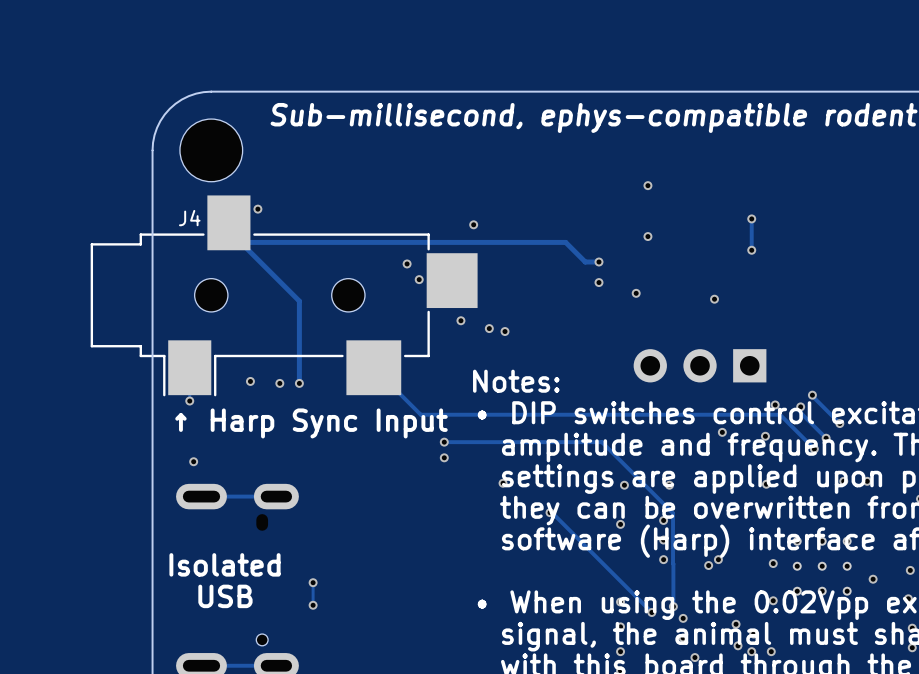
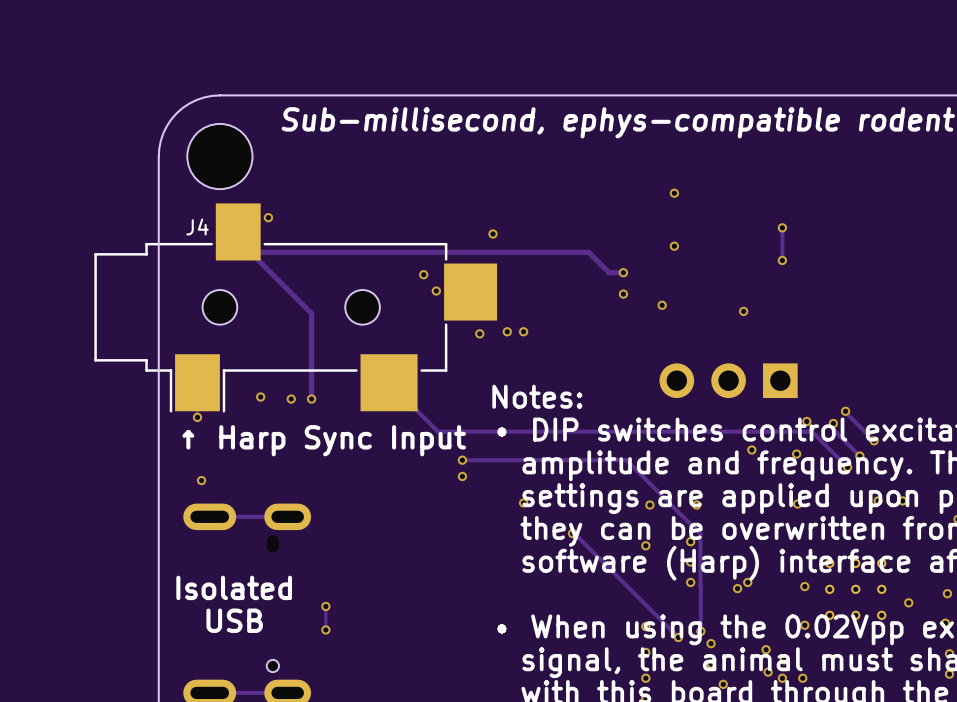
via: none -> (507, 331)
via: none -> (523, 331)
via: (489, 328) -> none
via: (505, 331) -> none

